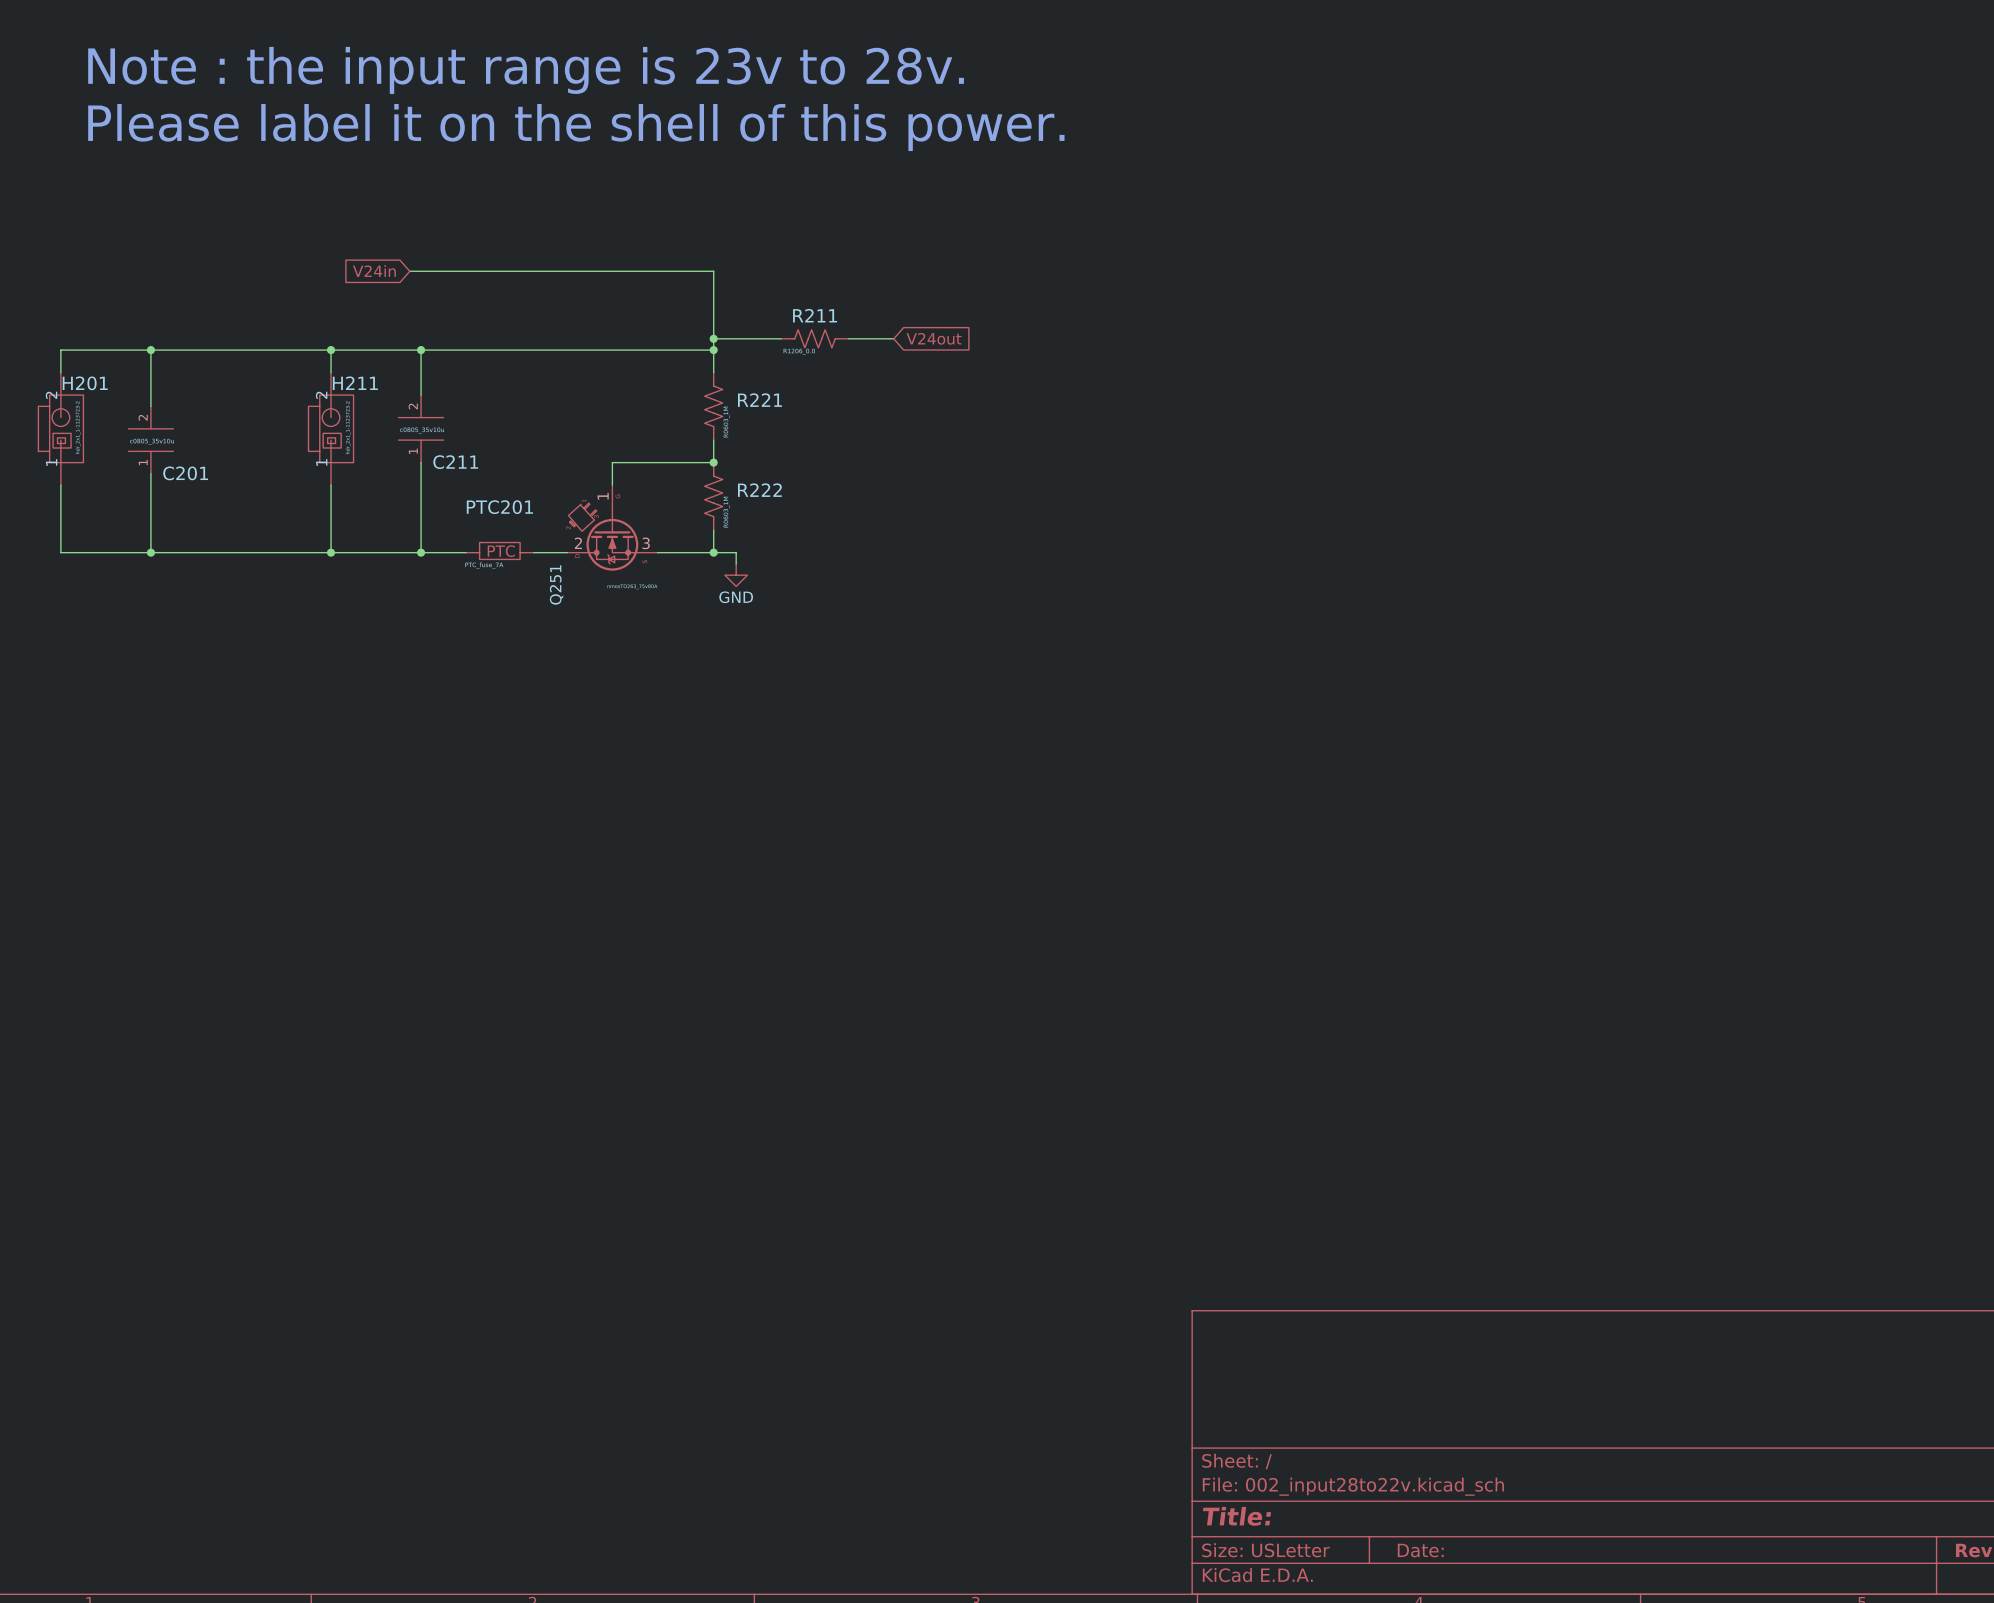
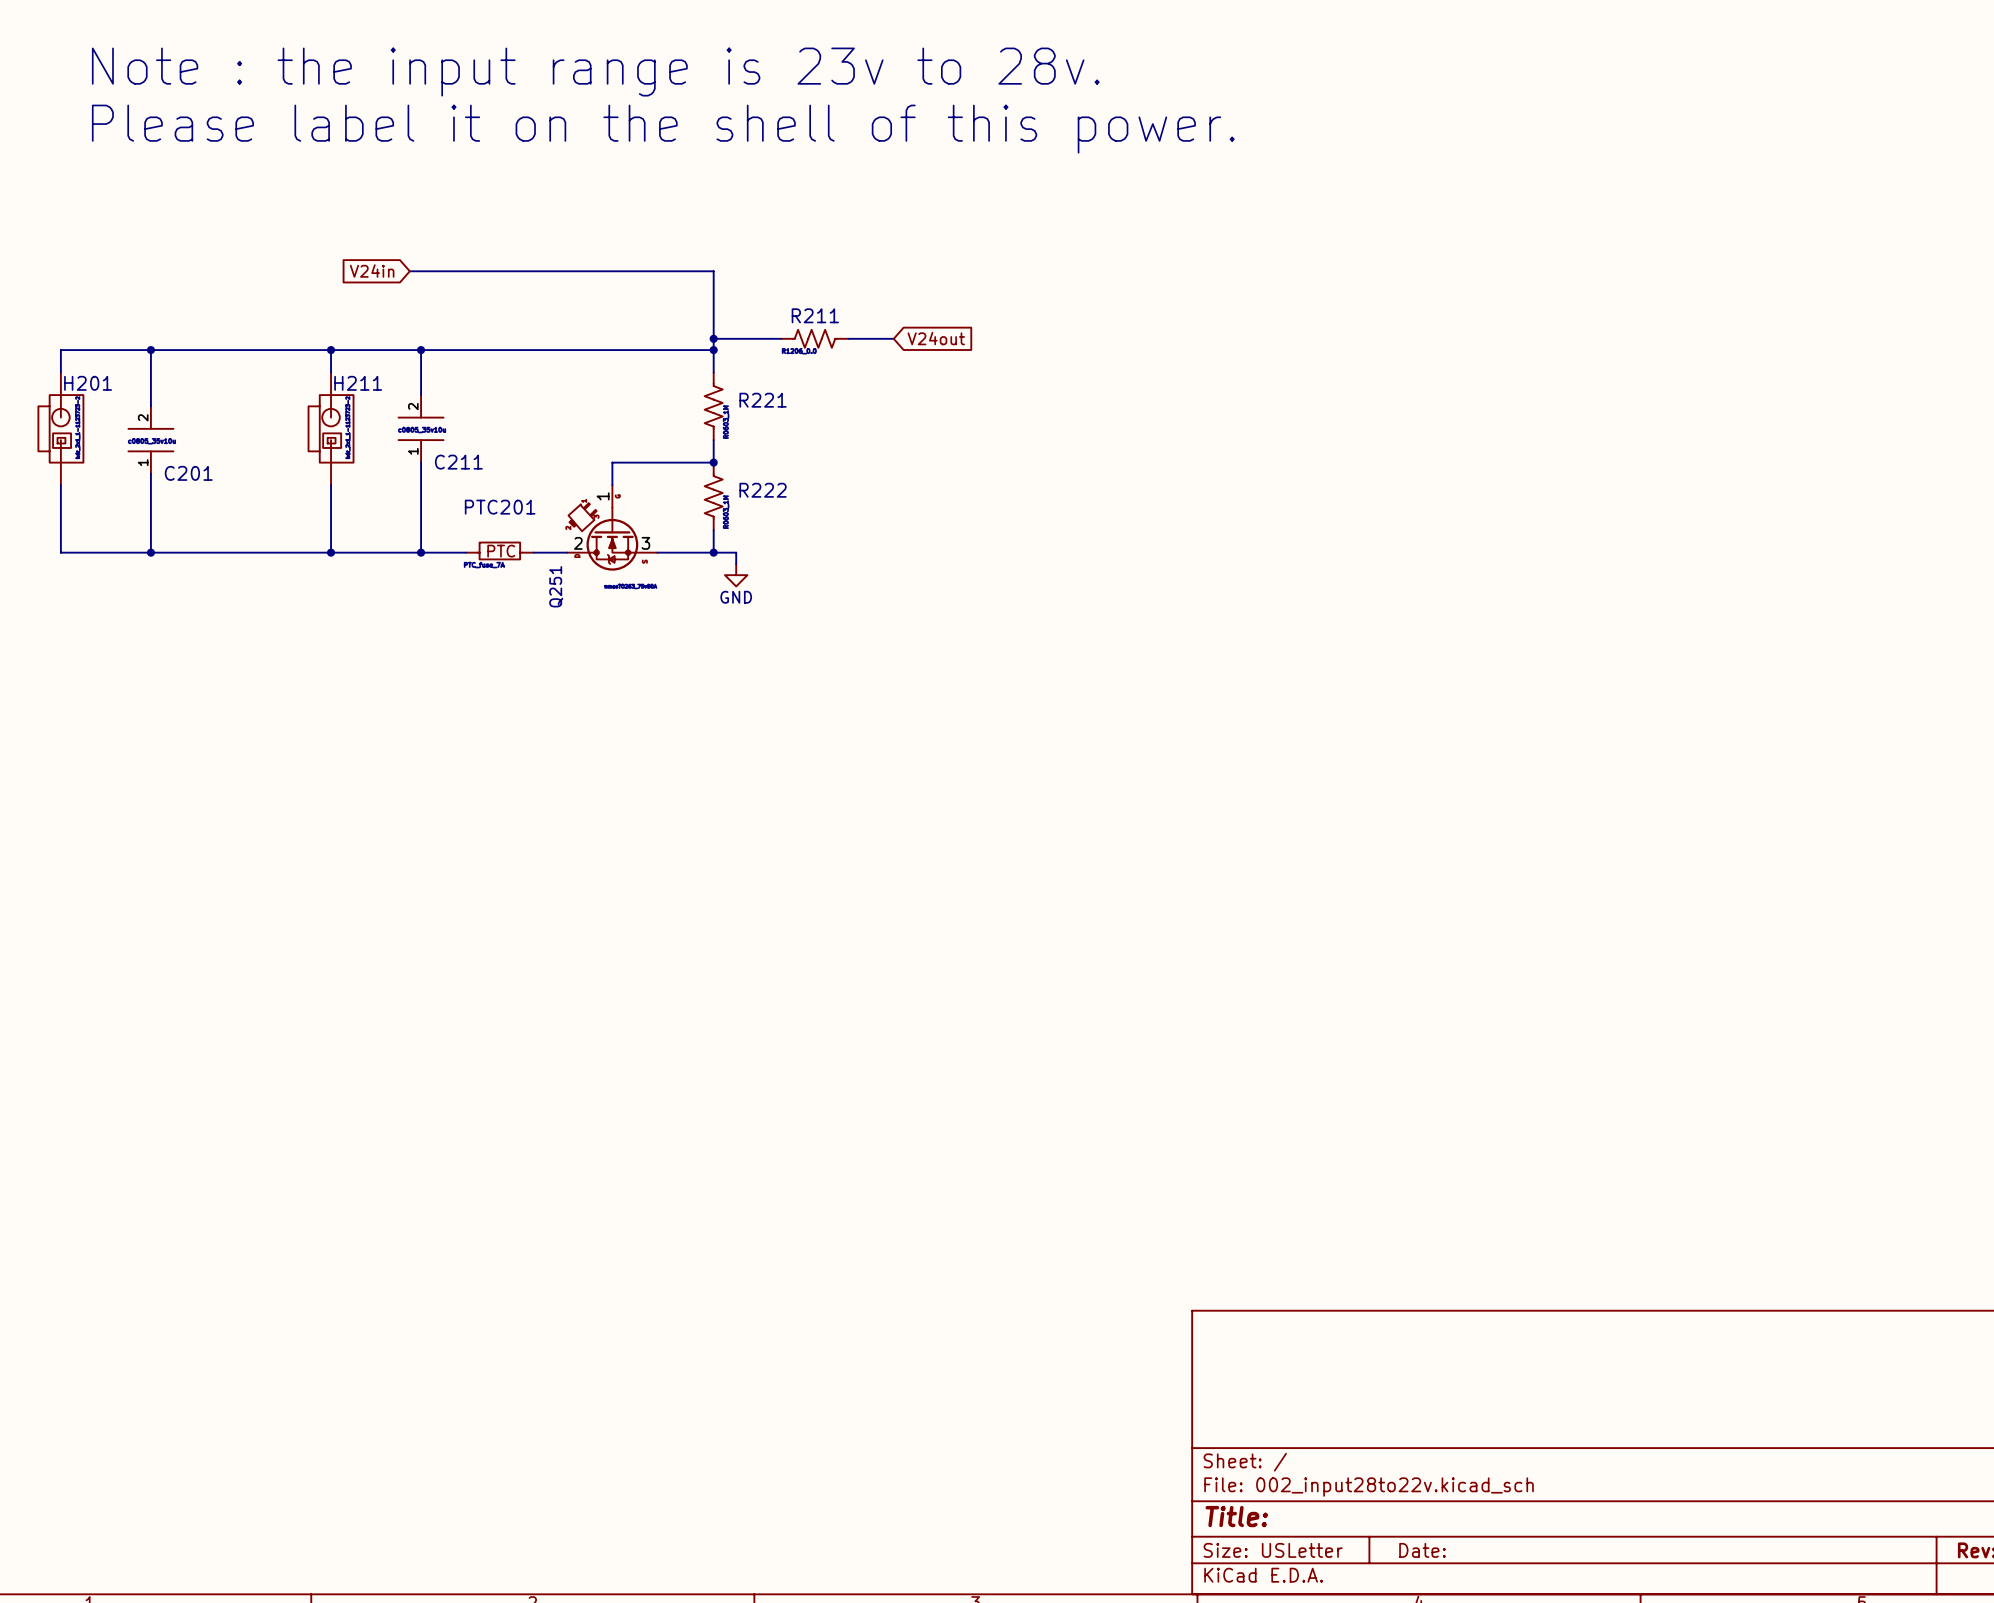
H201 pin name: 2 (51, 395) -> none
H211 pin name: 2 (321, 395) -> none
H201 pin name: 1 (51, 462) -> none
H211 pin name: 1 (321, 462) -> none

